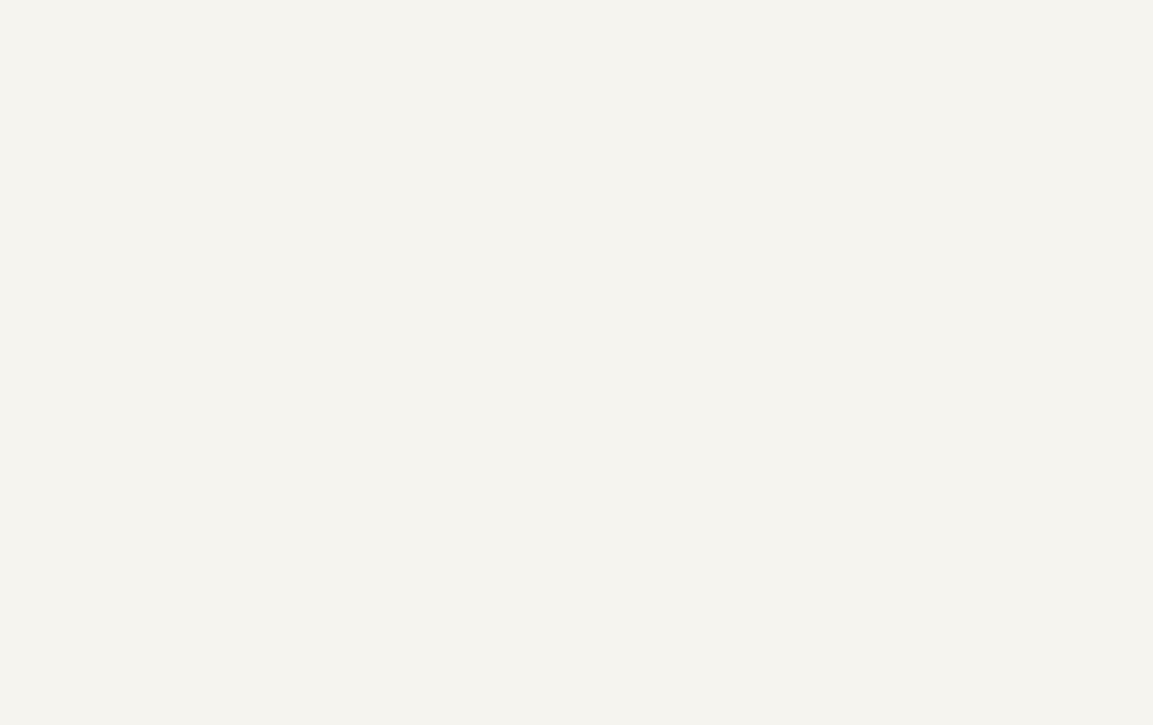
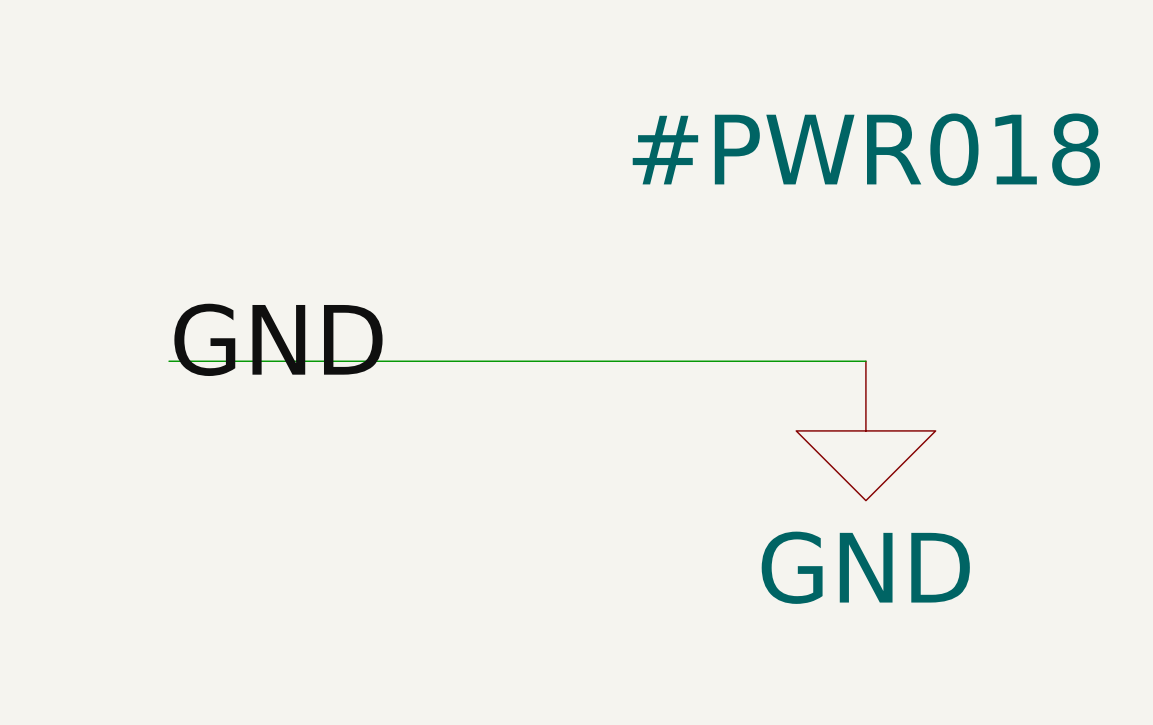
label: none -> GND (278, 339)
wire: none -> (169, 361) (865, 361)
#PWR018: none -> GND (865, 430)

